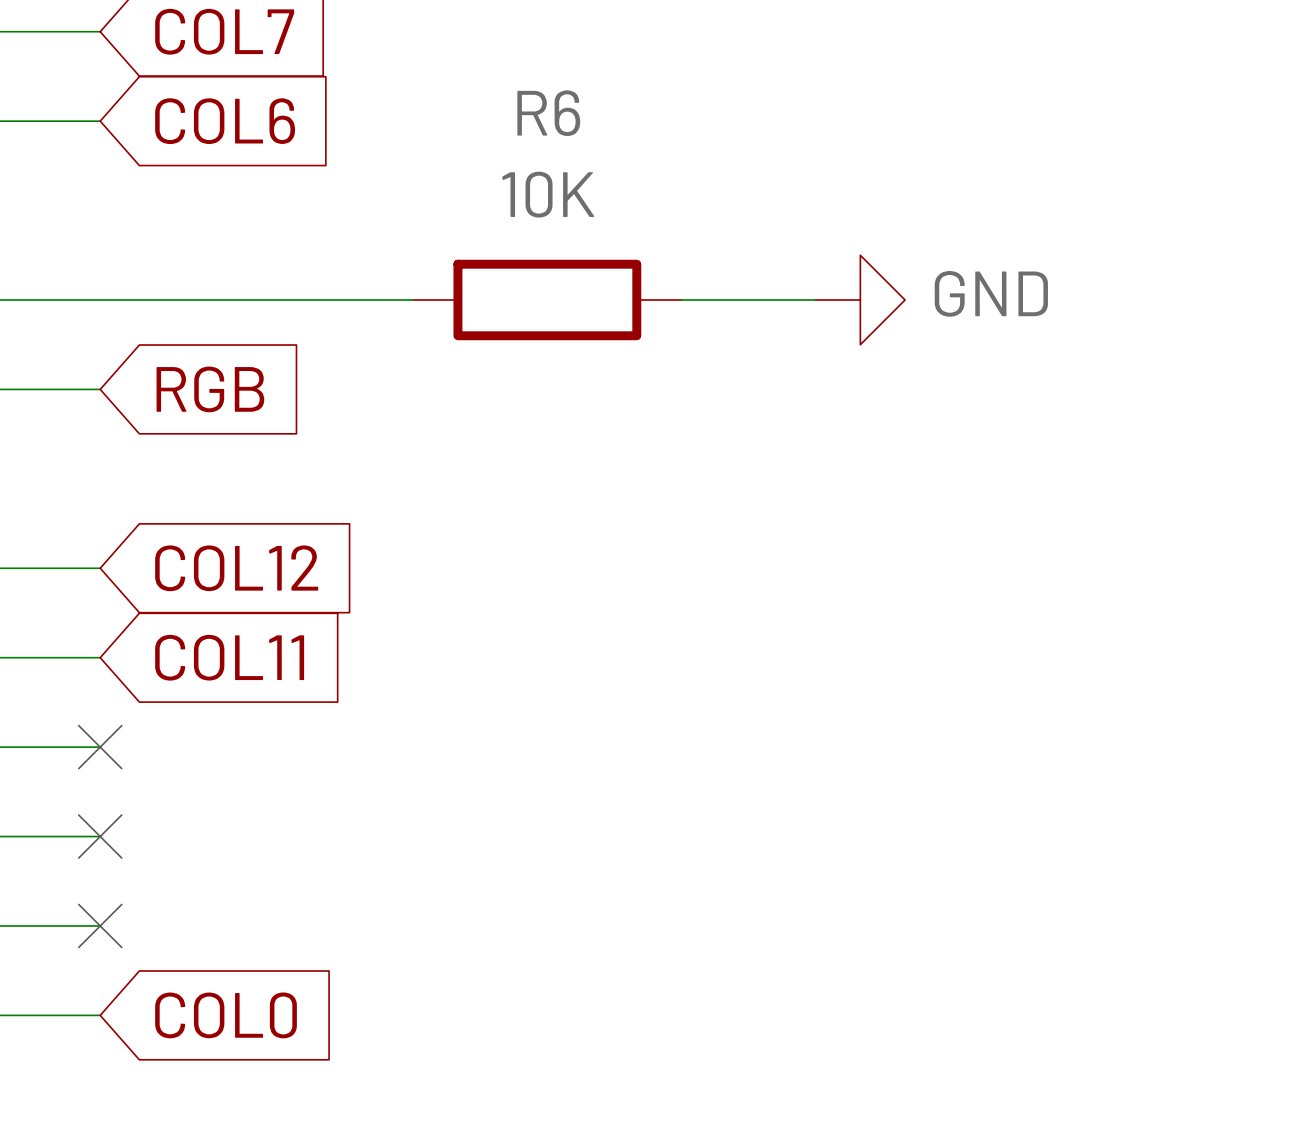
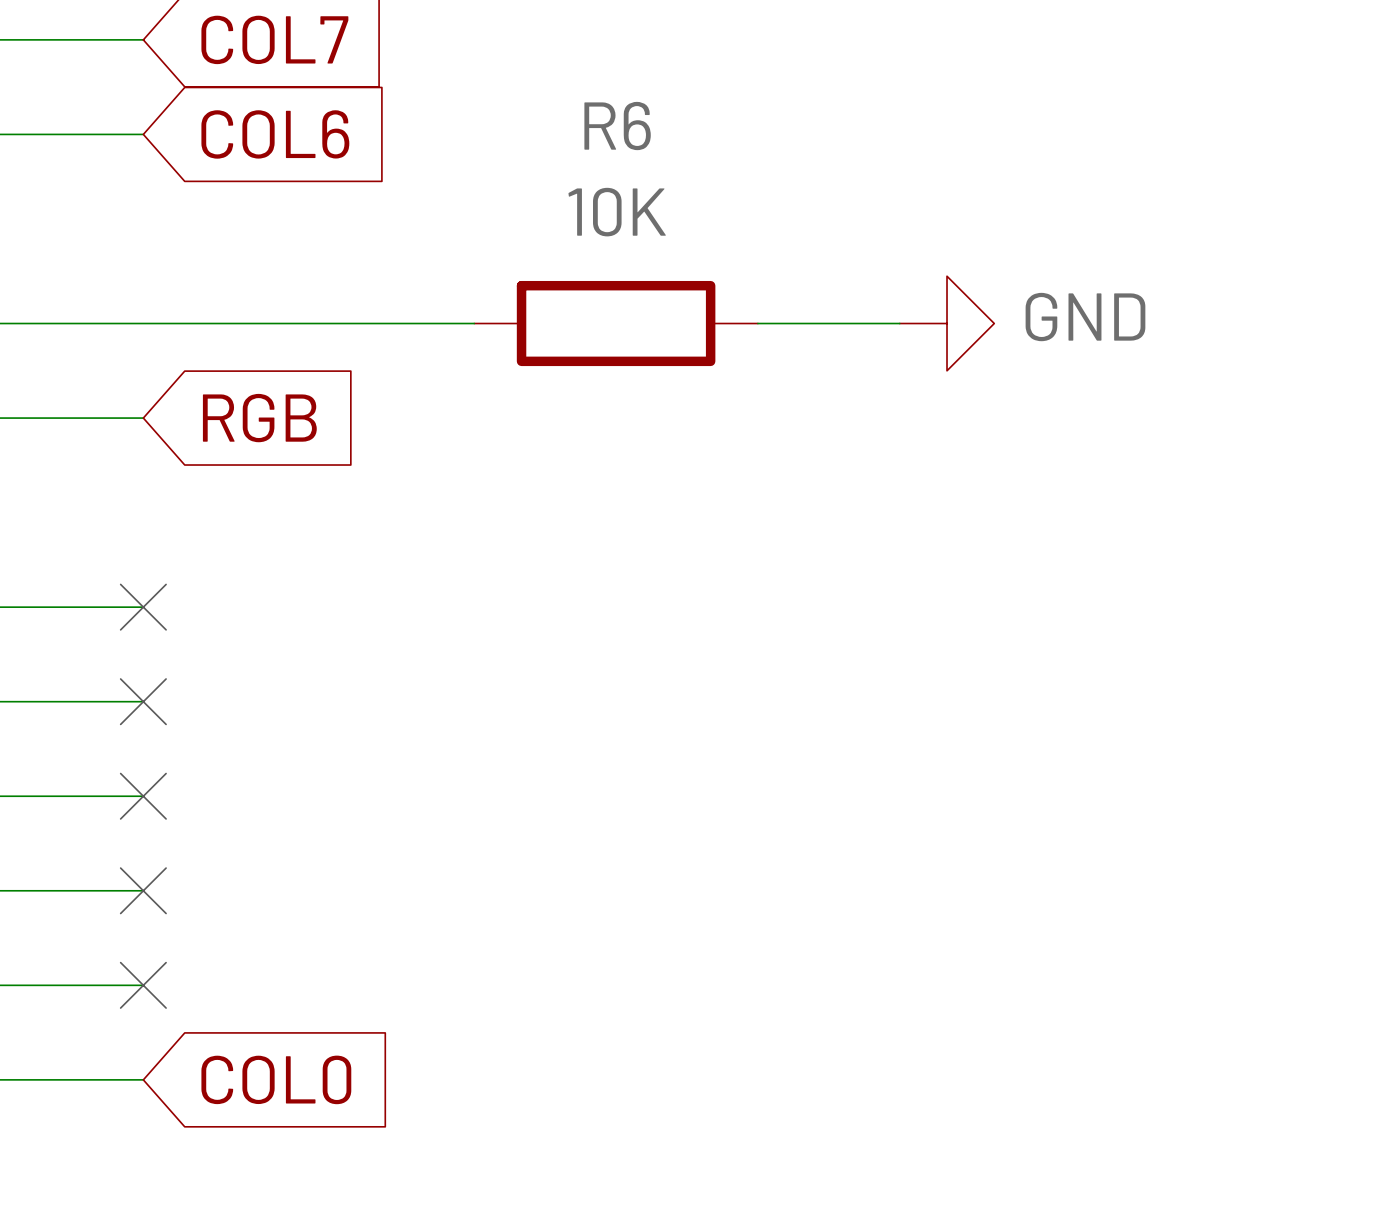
no-connect mark: none -> (143, 607)
global label: COL12 (236, 568) -> none
no-connect mark: none -> (143, 701)
global label: COL11 (229, 657) -> none

